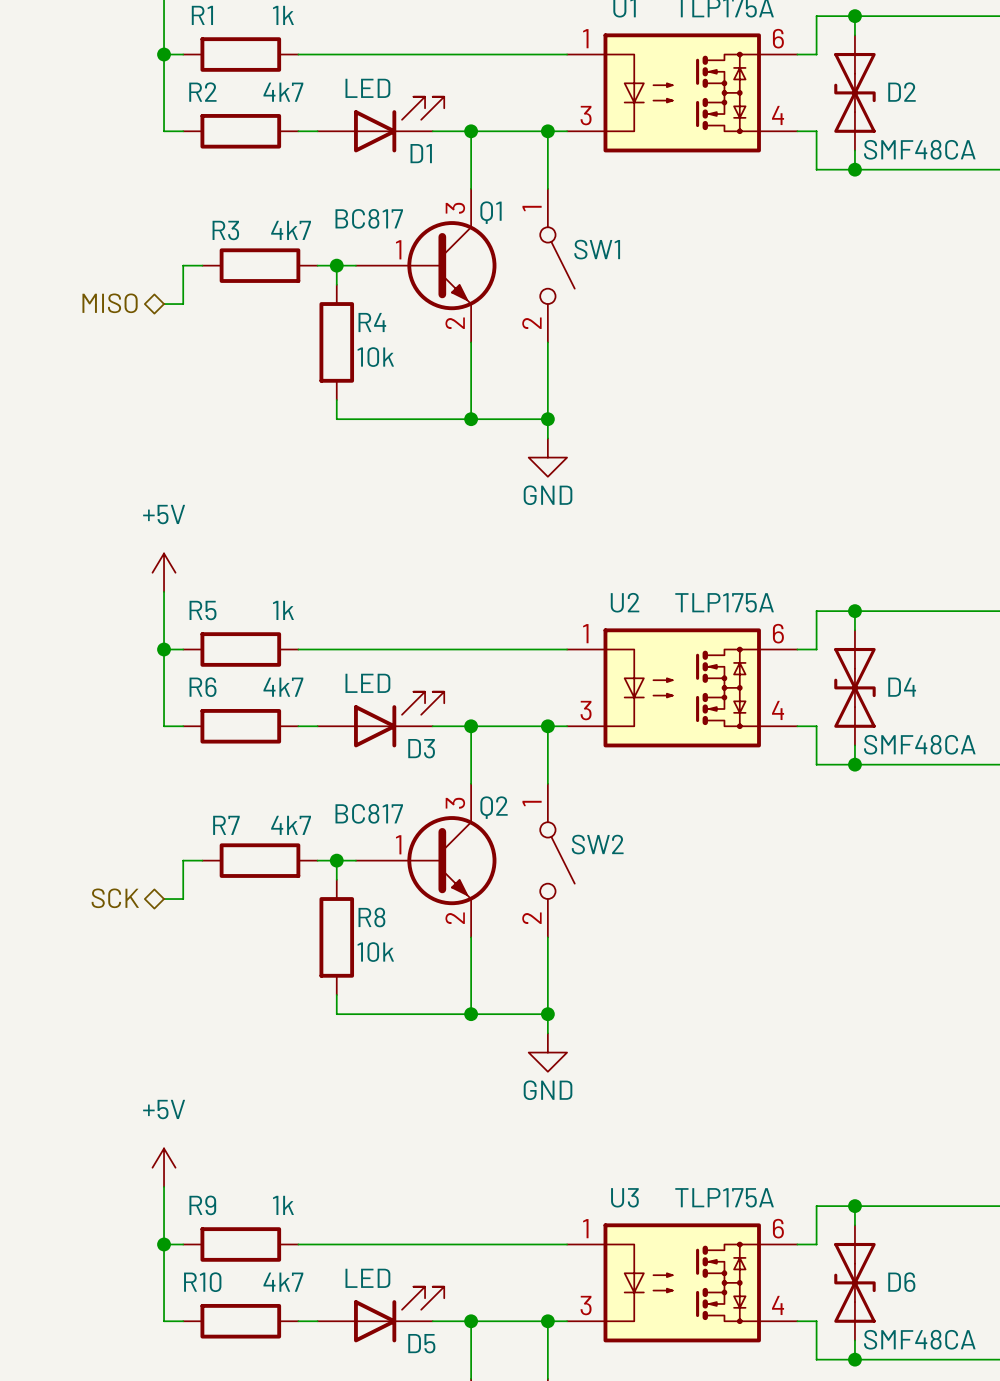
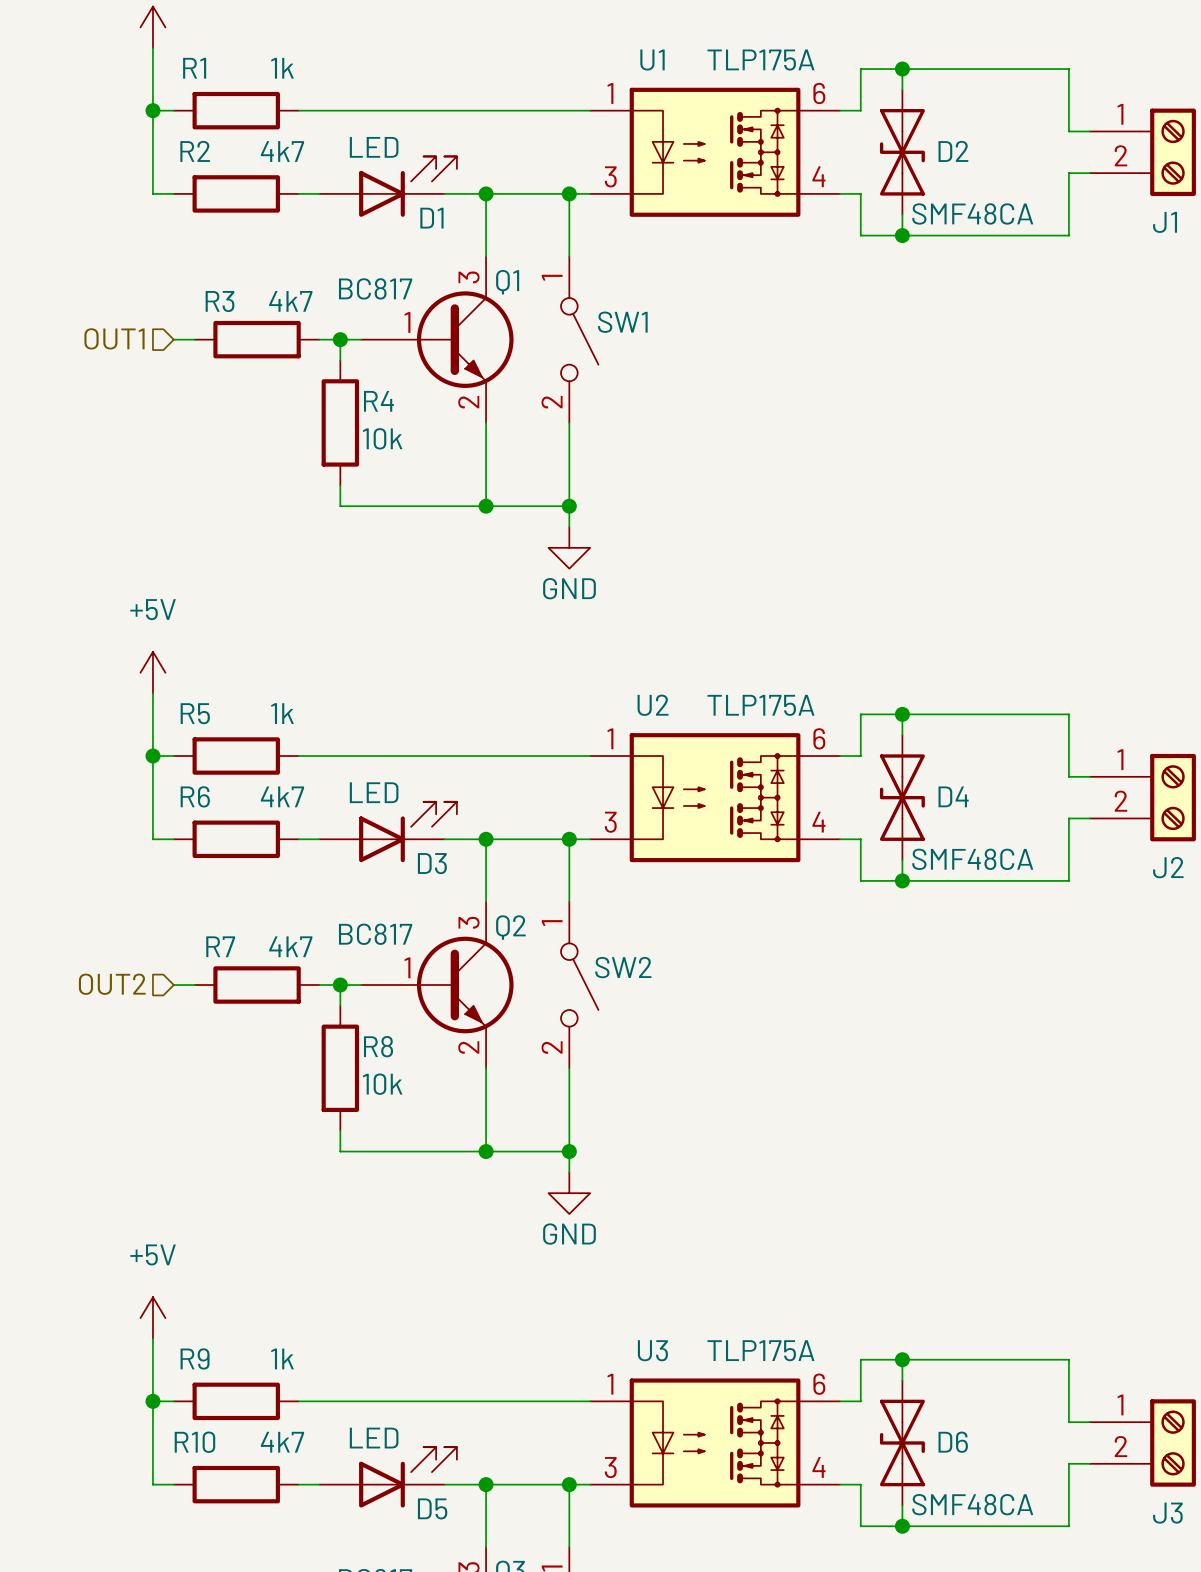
hierarchical label: none -> OUT1 (114, 338)
wire: (183, 265) (183, 304) (164, 304) -> none
hierarchical label: MISO (110, 303) -> none
hierarchical label: none -> OUT2 (112, 984)
wire: (183, 860) (183, 899) (164, 899) -> none
hierarchical label: SCK (115, 898) -> none

